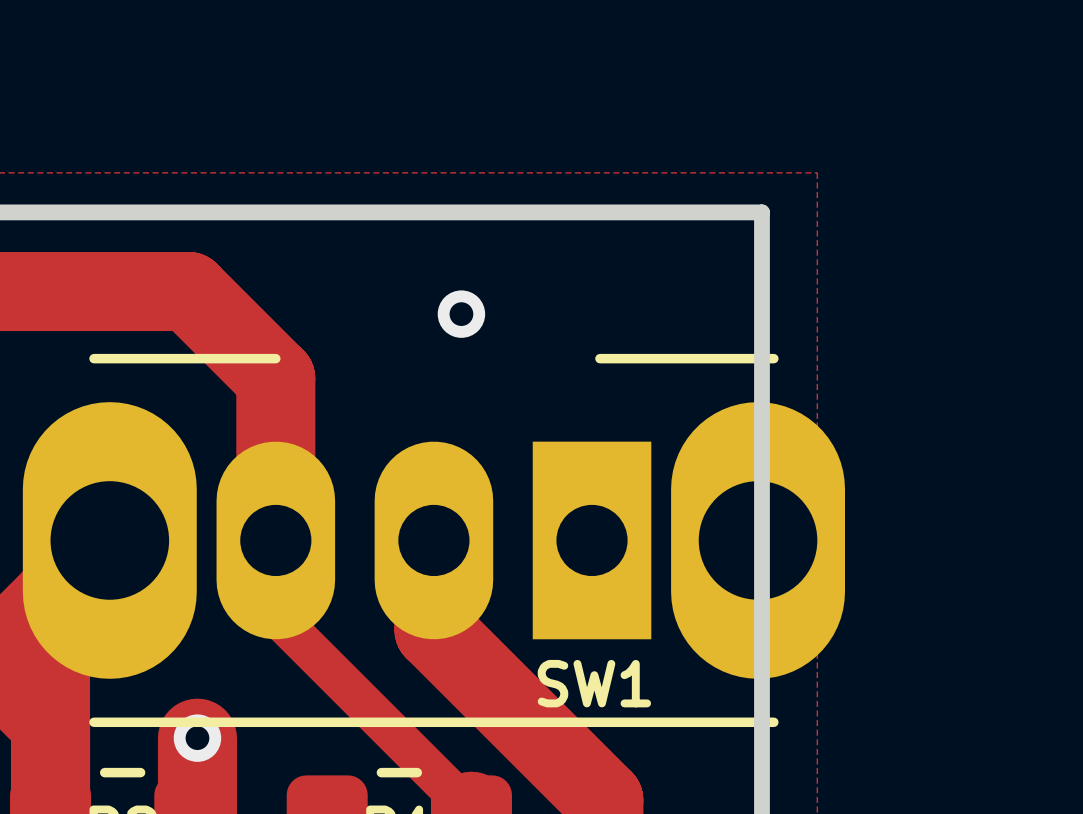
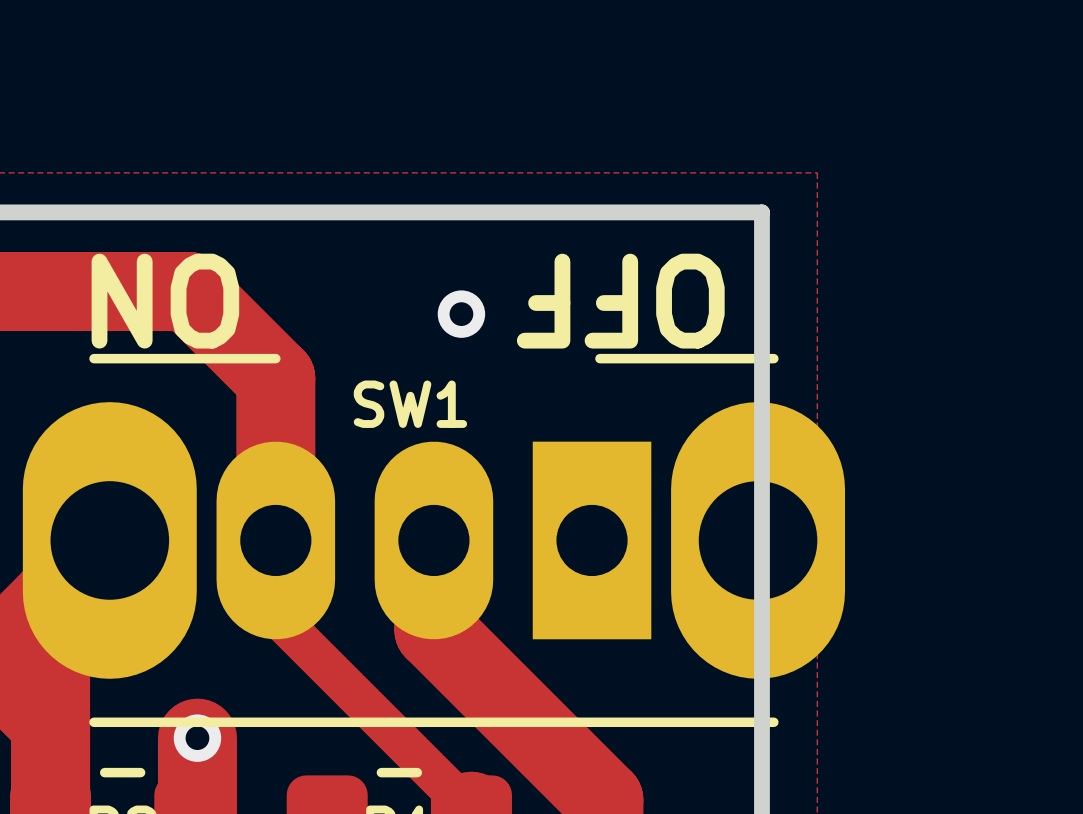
text: none -> ON (165, 301)
text: none -> OFF (620, 301)
SW1 name position: SW1 (594, 683) -> SW1 (410, 404)

